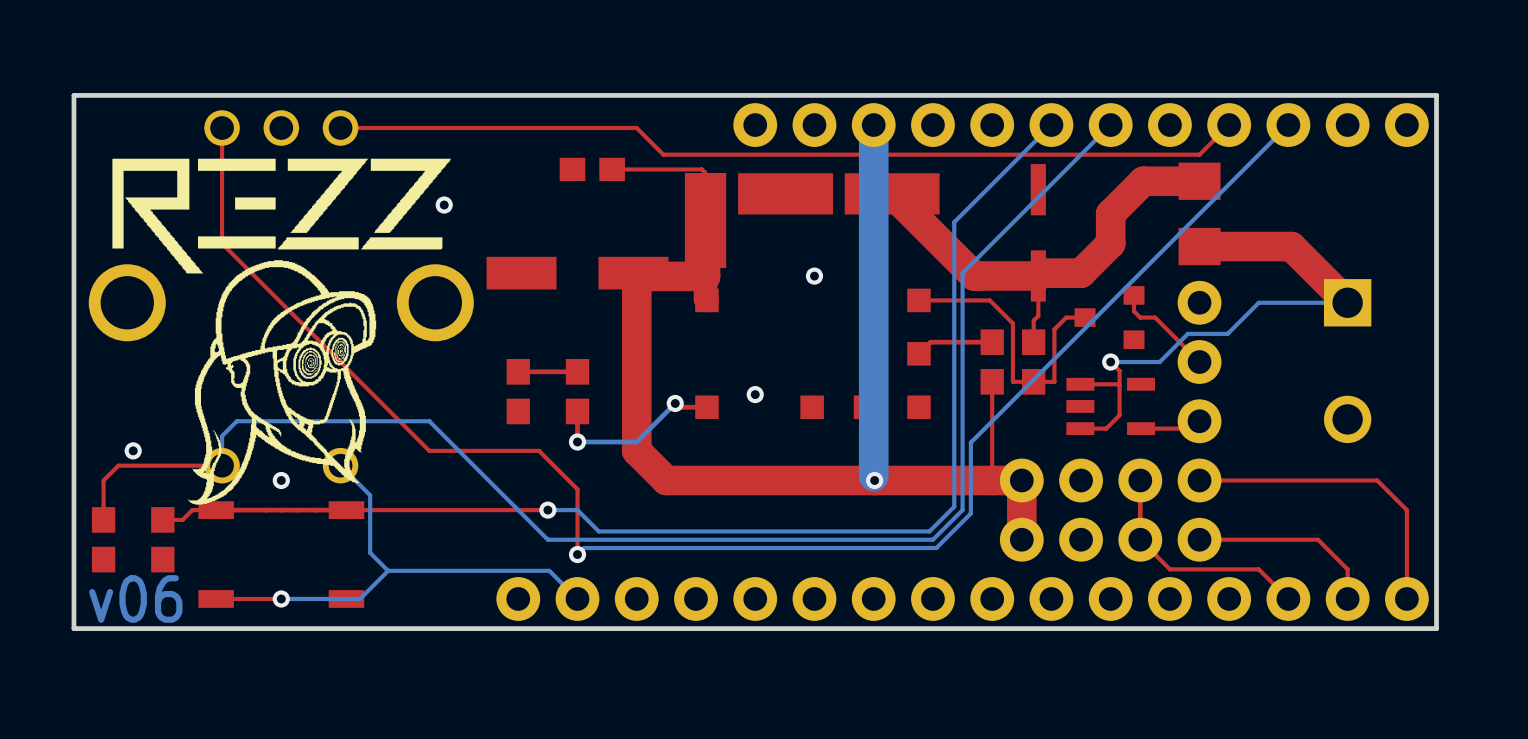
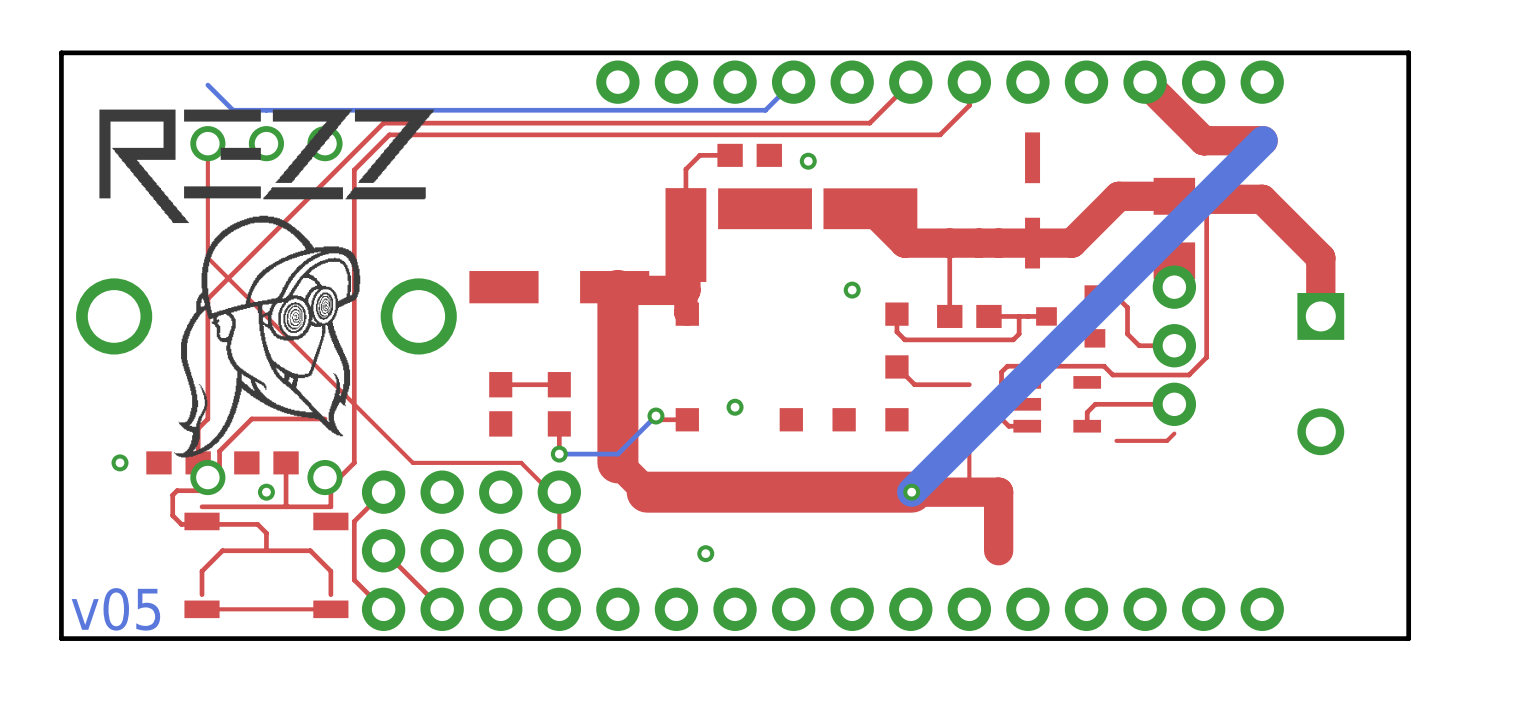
bottom track: none -> (793, 82) (765, 110) (233, 110) (207, 85)
top track: none -> (910, 82) (869, 123) (383, 123) (207, 298) (207, 418) (198, 428) (198, 462)
top track: none -> (969, 82) (969, 105) (940, 134) (389, 134) (354, 170) (354, 462) (330, 486) (330, 506) (202, 506)
top track: none -> (1145, 82) (1203, 140) (1263, 140)
board edge: (1436, 95) (73, 95) -> (1408, 111) (1408, 52) (61, 52) (61, 111)
bottom track: (873, 125) (874, 480) -> none
bottom track: (1051, 125) (954, 222) (954, 506) (929, 531) (598, 531) (577, 510) (547, 510) -> none
part position: (1081, 125) -> (940, 82)
bottom track: (1110, 125) (962, 273) (962, 510) (932, 539) (547, 539) (429, 421) (236, 421) (222, 436) (222, 465) -> none
top track: (1229, 125) (1199, 154) (663, 154) (636, 128) (340, 128) -> none
bottom track: (1288, 125) (970, 442) (970, 513) (936, 548) (584, 548) (577, 554) -> none
bottom track: none -> (1263, 140) (911, 492)
part: none -> (749, 155)
via: none -> (808, 161)
part: (592, 169) -> none
top track: (612, 169) (701, 169) (704, 172) (705, 220) -> (730, 155) (699, 155) (685, 169) (685, 235)
via: (444, 205) -> none
top track: (1110, 213) (1110, 243) (1081, 273) (1041, 273) (1038, 275) -> none
drawing position: (281, 216) -> (266, 166)
top track: (926, 228) (974, 275) (1038, 275) -> (904, 243) (1071, 243) (1086, 228)
top track: none -> (949, 243) (949, 316)
part position: (1038, 232) -> (1032, 200)
top track: (1199, 246) (1291, 246) (1347, 302) -> (1027, 426) (1008, 426) (1001, 418) (1001, 372) (1007, 366) (1104, 366) (1112, 375) (1189, 375) (1206, 357) (1206, 199) (1262, 199) (1320, 257) (1320, 316)
part: none -> (1174, 287)
top track: (1038, 275) (1038, 315) (1033, 320) (1033, 342) -> none
top track width: thin (636, 276) (636, 450) -> thick (617, 290) (617, 462)
via position: (814, 276) -> (852, 290)
top track: none -> (1094, 294) (1114, 294) (1127, 307) (1127, 334) (1139, 345) (1174, 345)
top track: (1134, 295) (1134, 311) (1140, 317) (1155, 317) (1199, 362) -> none
top track: (918, 300) (989, 300) (1012, 323) (1012, 381) (1054, 381) (1054, 329) (1066, 317) (1085, 317) -> (896, 314) (896, 331) (904, 339) (1013, 339) (1019, 334) (1019, 316)
part: none -> (969, 316)
top track: none -> (1046, 316) (988, 316)
part: (1199, 302) -> none
bottom track: (1347, 302) (1258, 302) (1227, 333) (1187, 333) (1159, 362) (1110, 362) -> none
part position: (1109, 317) -> (1070, 316)
part: none -> (1174, 345)
top track: (992, 342) (930, 342) (918, 353) -> (969, 384) (914, 384) (896, 366)
part: (992, 362) -> none
part: (1033, 362) -> none
top track: (1110, 362) (1119, 370) (1119, 415) (1106, 428) (1080, 428) -> none
via: (1110, 362) -> none
part: (1199, 362) -> none
drawing position: (282, 382) -> (267, 336)
top track: (991, 382) (992, 381) (992, 411) -> none
top track: (1080, 384) (1119, 385) -> none
top track: none -> (1174, 404) (1095, 404) (1087, 412) (1087, 426)
part: none -> (1174, 404)
top track: none -> (325, 418) (251, 418) (219, 451) (219, 477) (206, 490) (177, 490) (172, 495) (172, 515) (181, 524) (257, 524) (266, 533) (266, 550)
part position: (1110, 406) -> (1057, 404)
part: (1199, 421) -> none
part: none -> (178, 462)
part: none -> (266, 462)
top track: none -> (286, 462) (286, 506)
top track: (222, 465) (118, 465) (103, 480) (103, 519) -> none
bottom track: (340, 465) (370, 495) (370, 552) (388, 570) -> none
top track: none -> (383, 492) (354, 521) (354, 580) (383, 609)
part: none -> (471, 492)
via position: (874, 480) -> (911, 492)
top track width: thin (933, 480) (666, 480) -> thick (911, 492) (647, 492)
part: (1110, 480) -> none
top track: (1140, 480) (1140, 539) (1169, 569) (1258, 569) (1288, 598) -> none
top track: (1199, 480) (1377, 480) (1406, 510) (1406, 598) -> none
top track: (547, 510) (192, 510) (182, 519) (162, 519) -> none
via: (547, 510) -> none
part: (103, 539) -> none
part: (162, 539) -> none
top track: none -> (383, 550) (442, 609)
part: none -> (471, 550)
part: (1110, 539) -> none
top track: (1199, 539) (1318, 539) (1347, 569) (1347, 598) -> none
via: none -> (705, 553)
via: (577, 554) -> none
bottom track: (388, 570) (359, 598) (281, 598) -> none
bottom track: (388, 570) (549, 570) (577, 598) -> none
top track: none -> (330, 594) (330, 571) (310, 550) (222, 550) (202, 571) (202, 594)
text: v06 (135, 598) -> v05 (115, 609)
via: (281, 598) -> none
part position: (962, 598) -> (822, 609)

